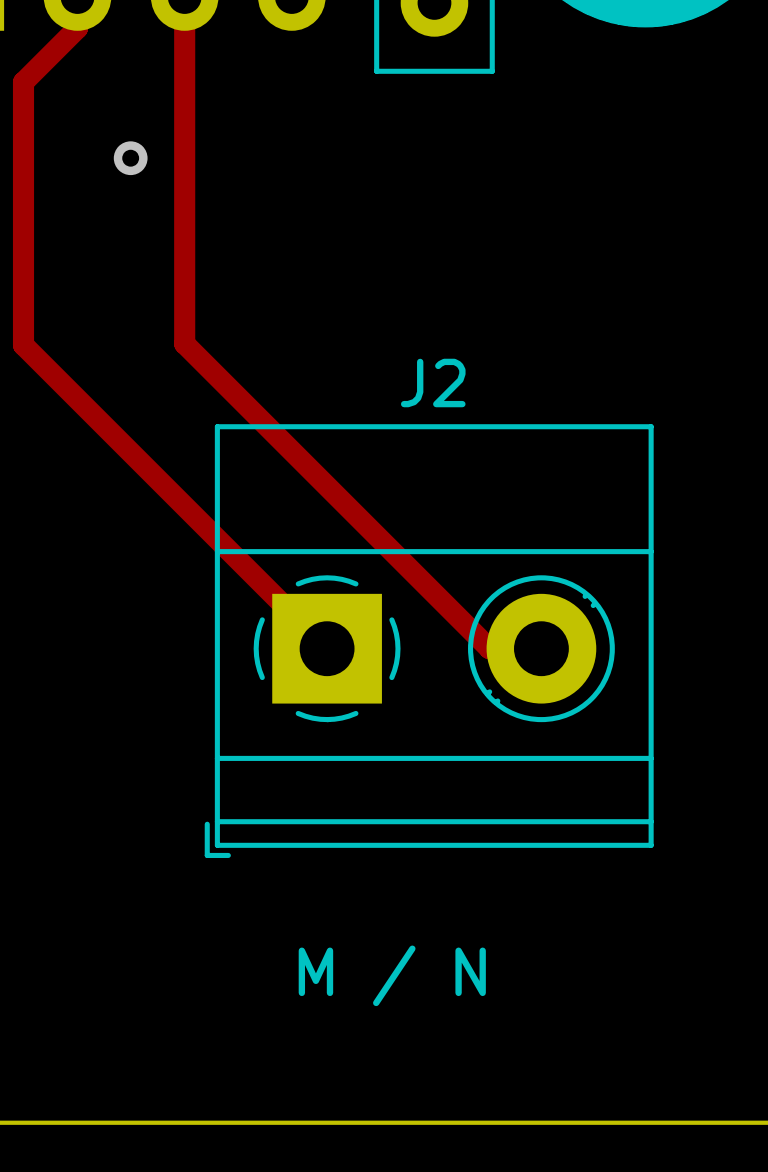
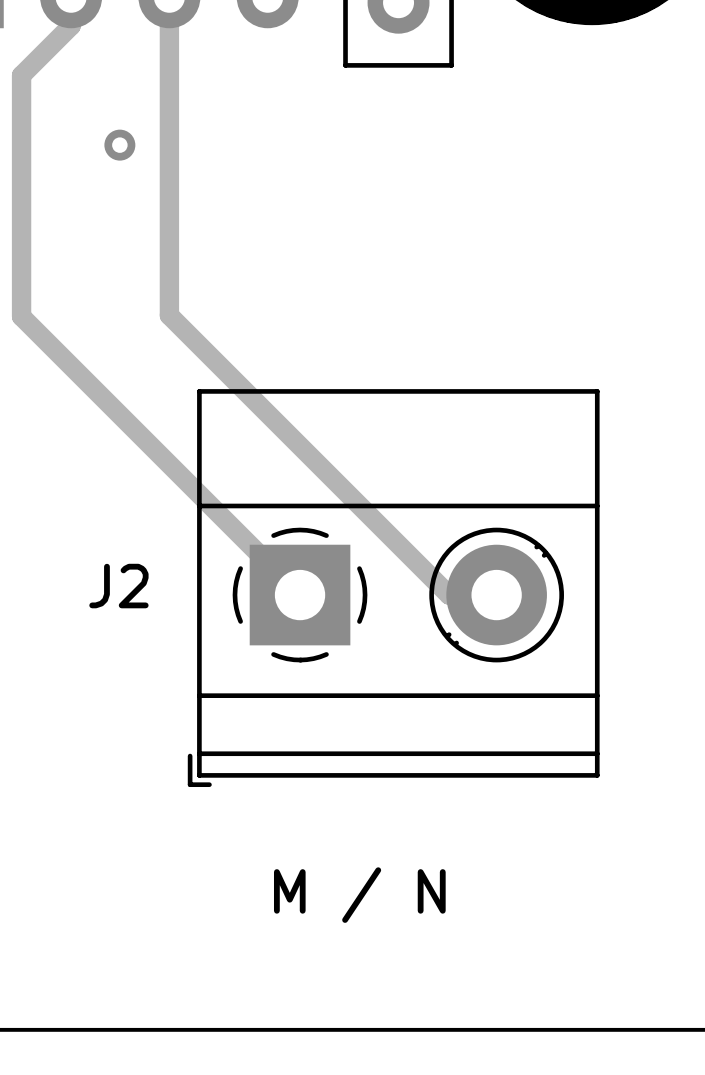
J2 name position: J2 (433, 383) -> J2 (118, 586)

